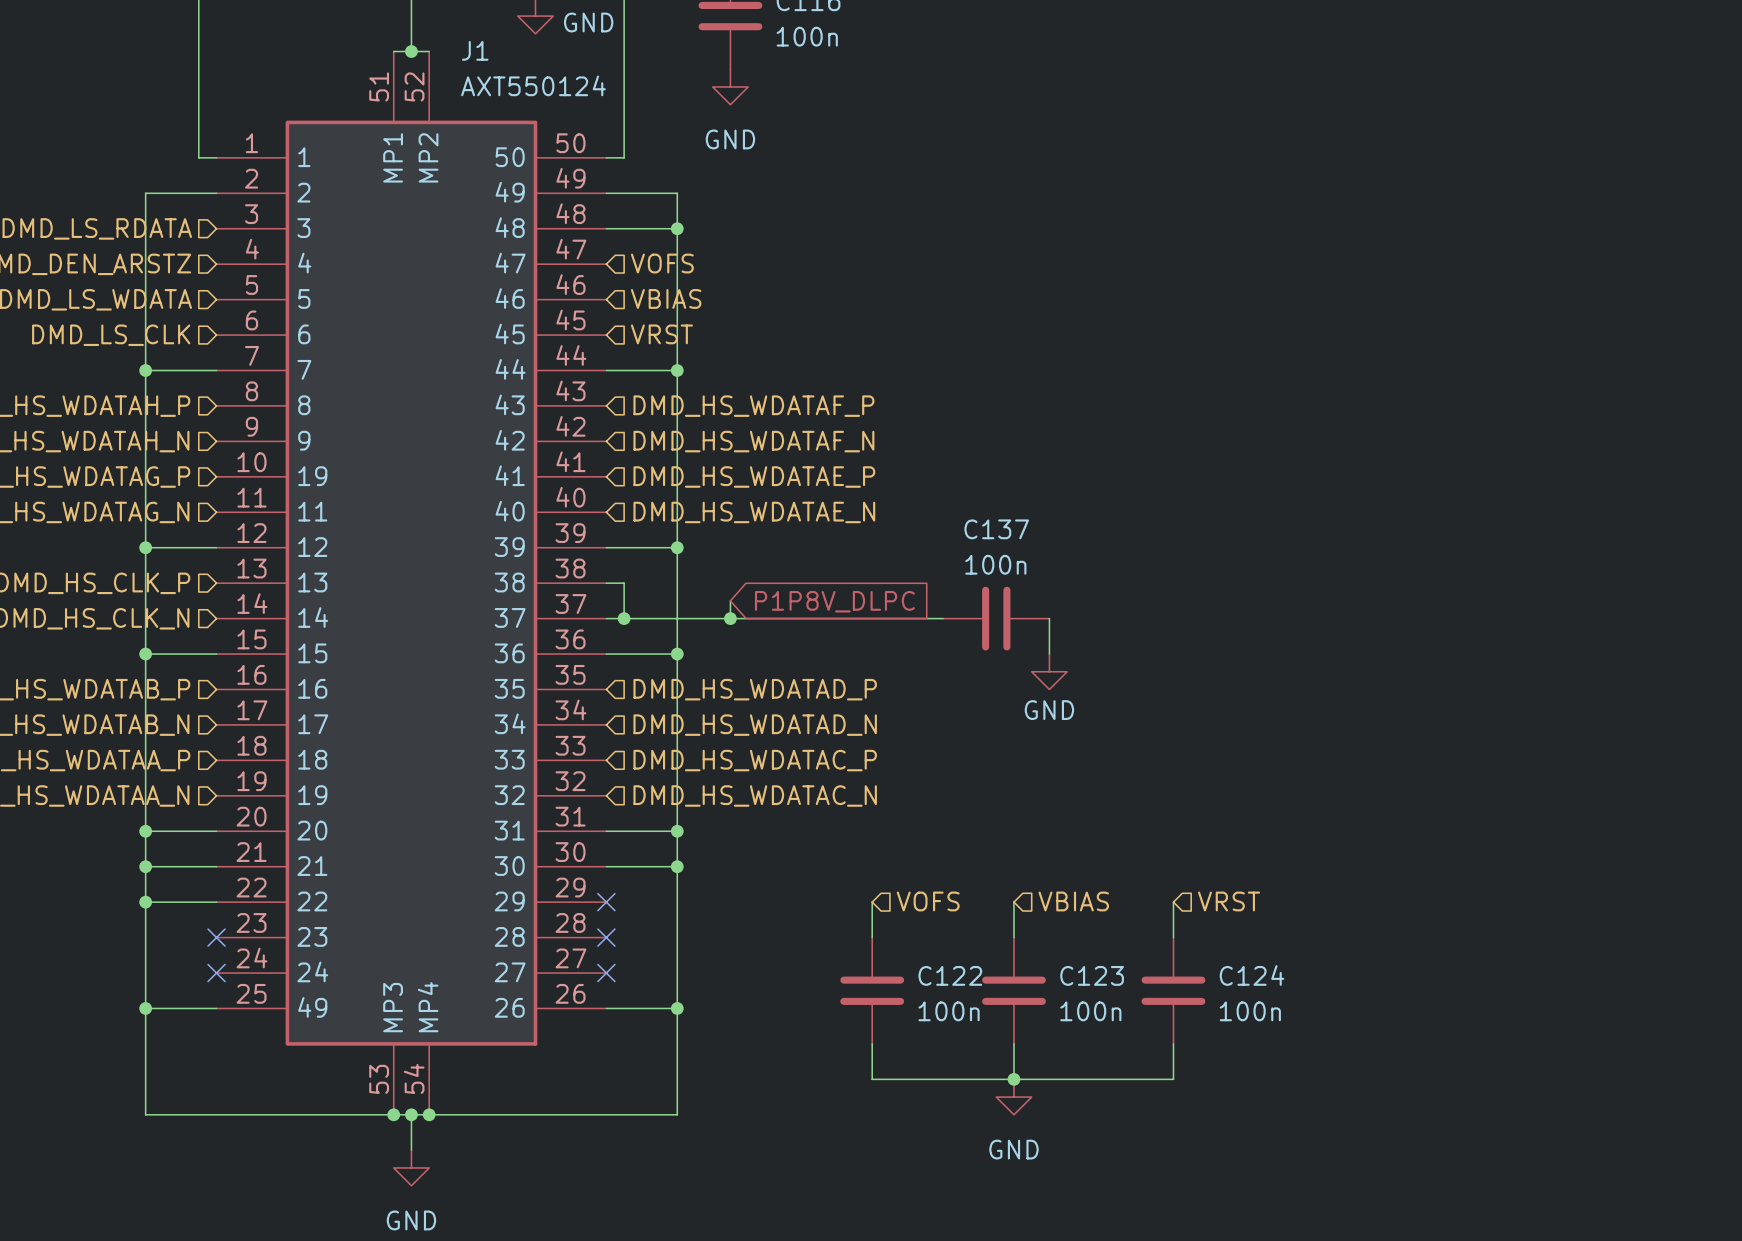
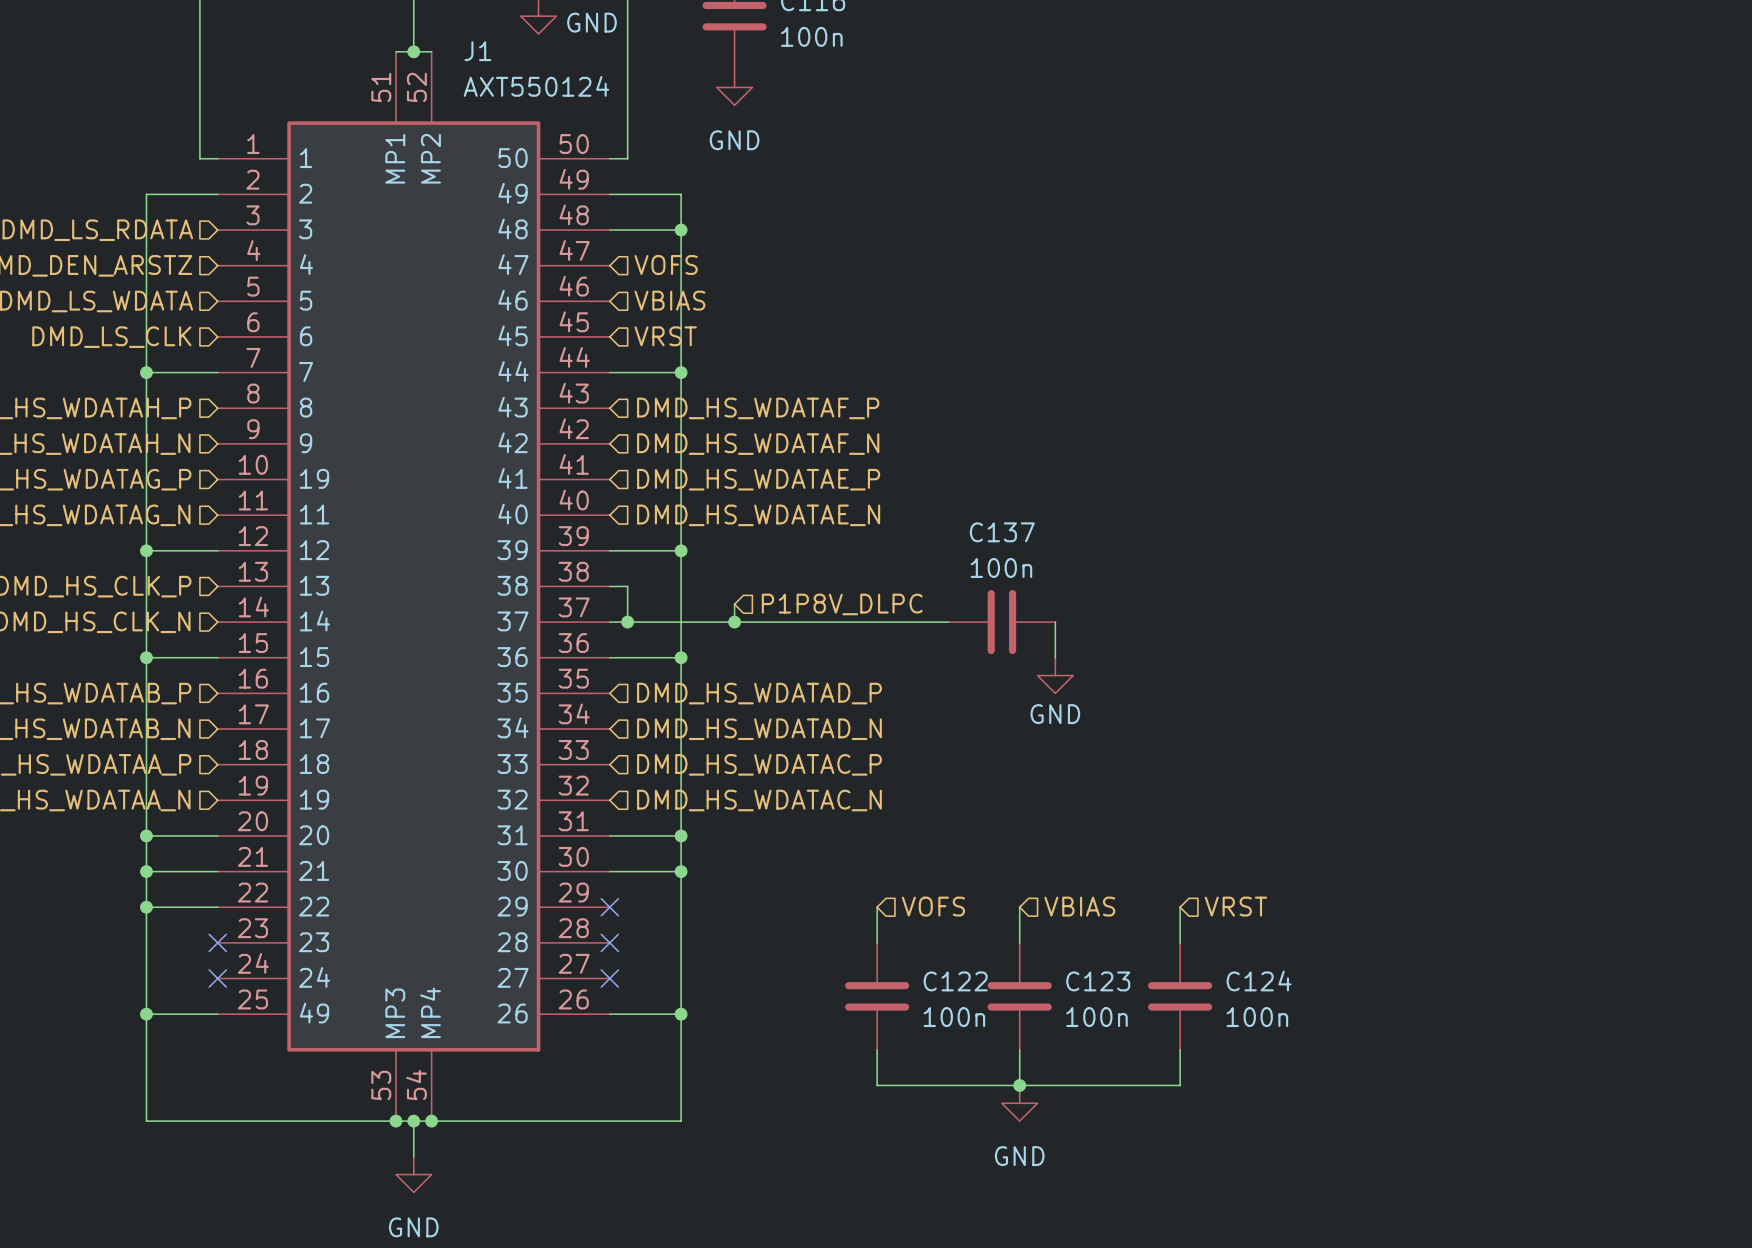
global label: P1P8V_DLPC (834, 601) -> none
hierarchical label: none -> P1P8V_DLPC (842, 604)

